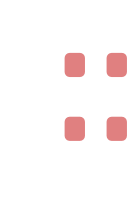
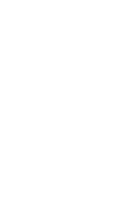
part: (95, 64) -> none
part: (95, 128) -> none

